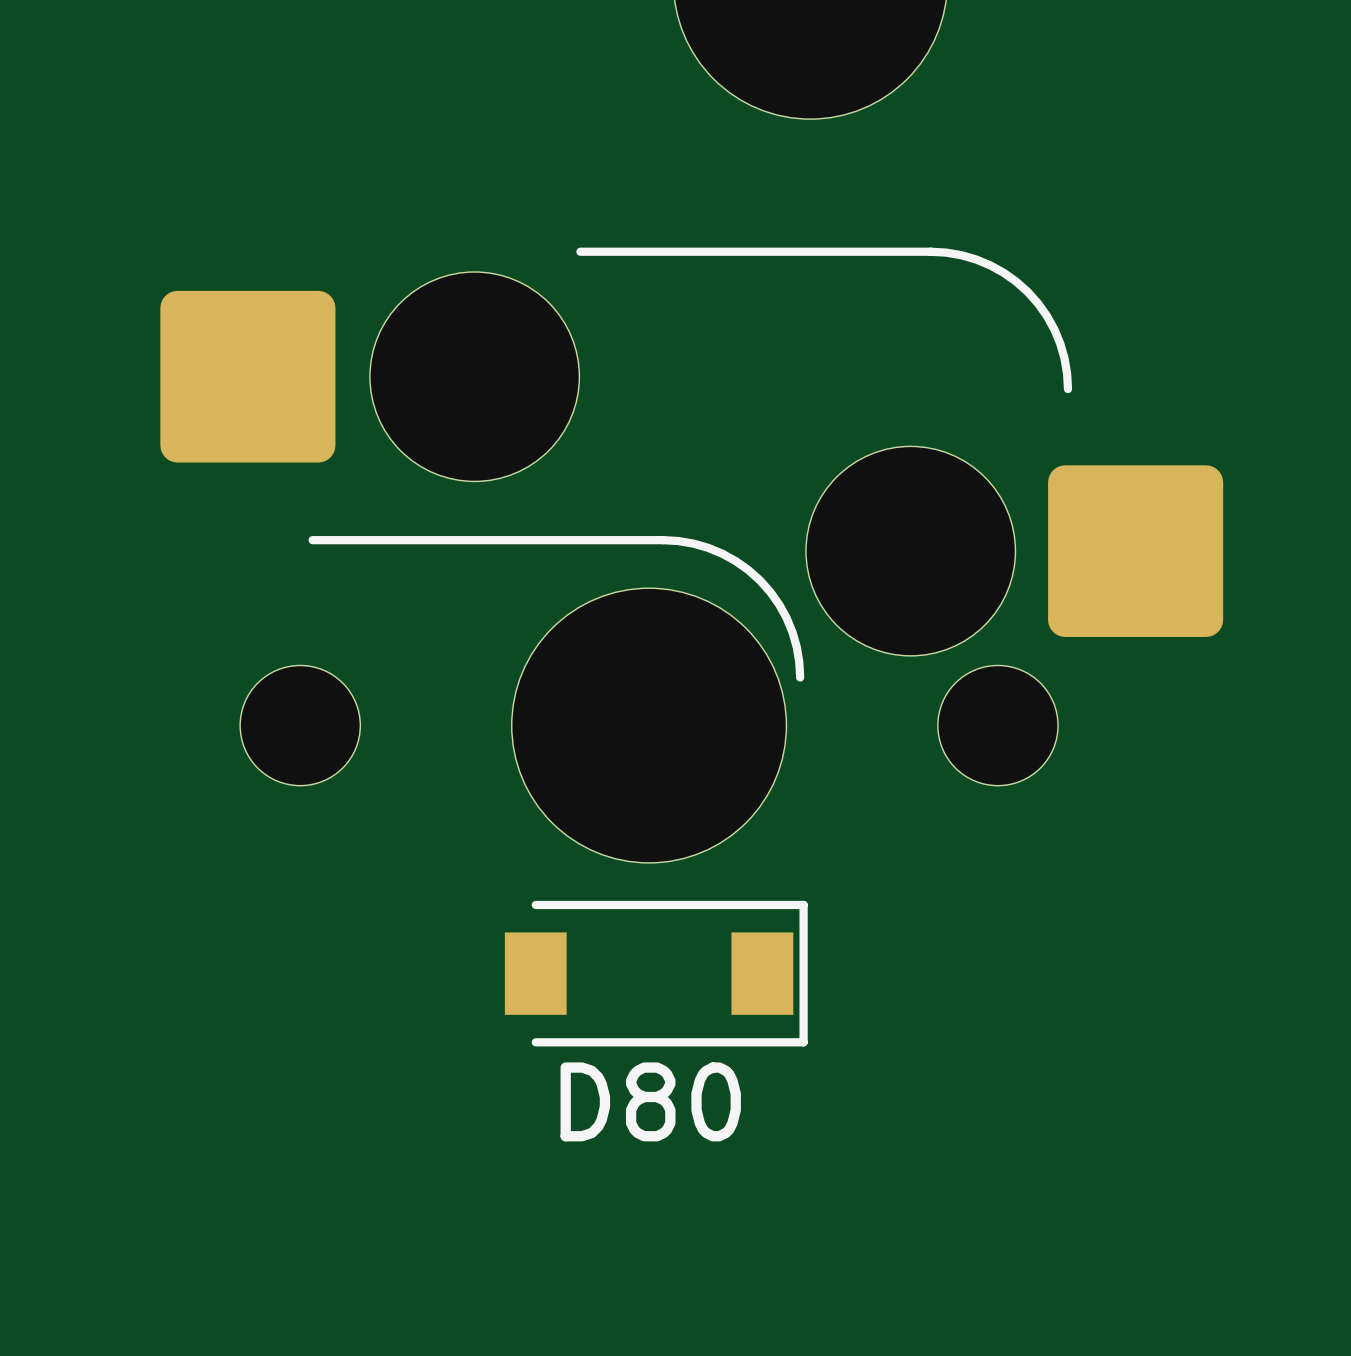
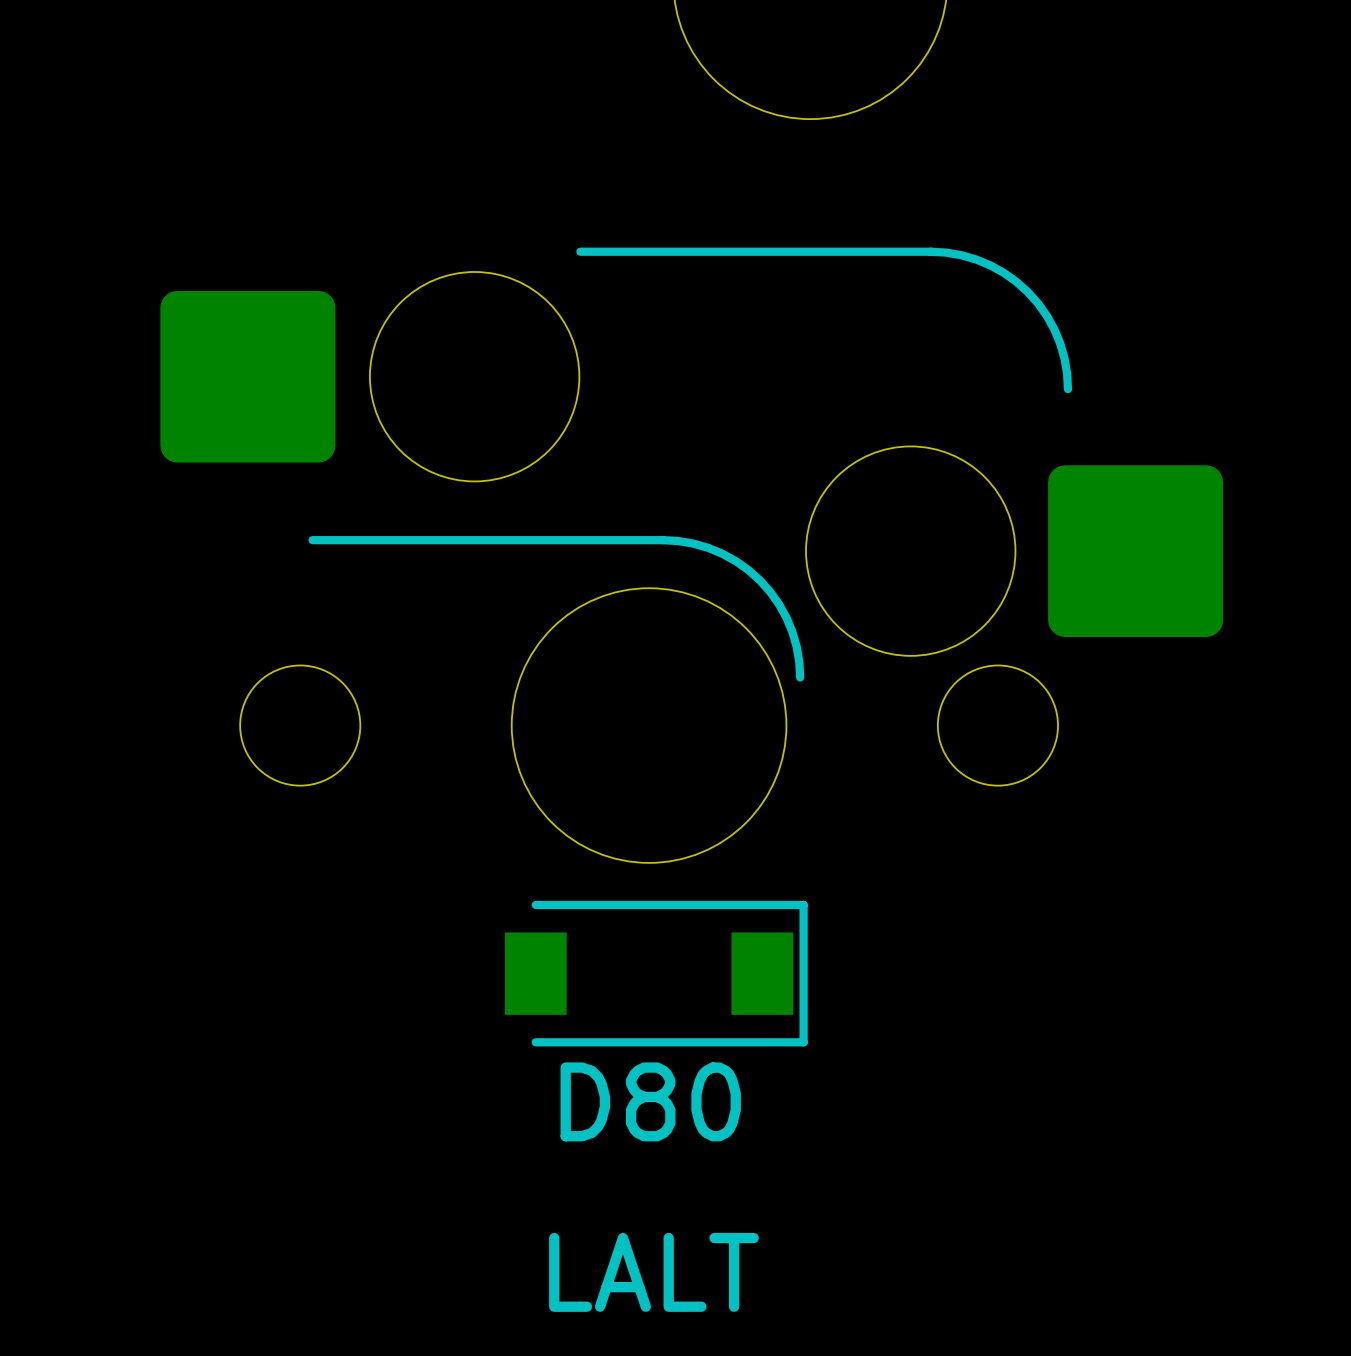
part value: none -> LALT (653, 1272)

